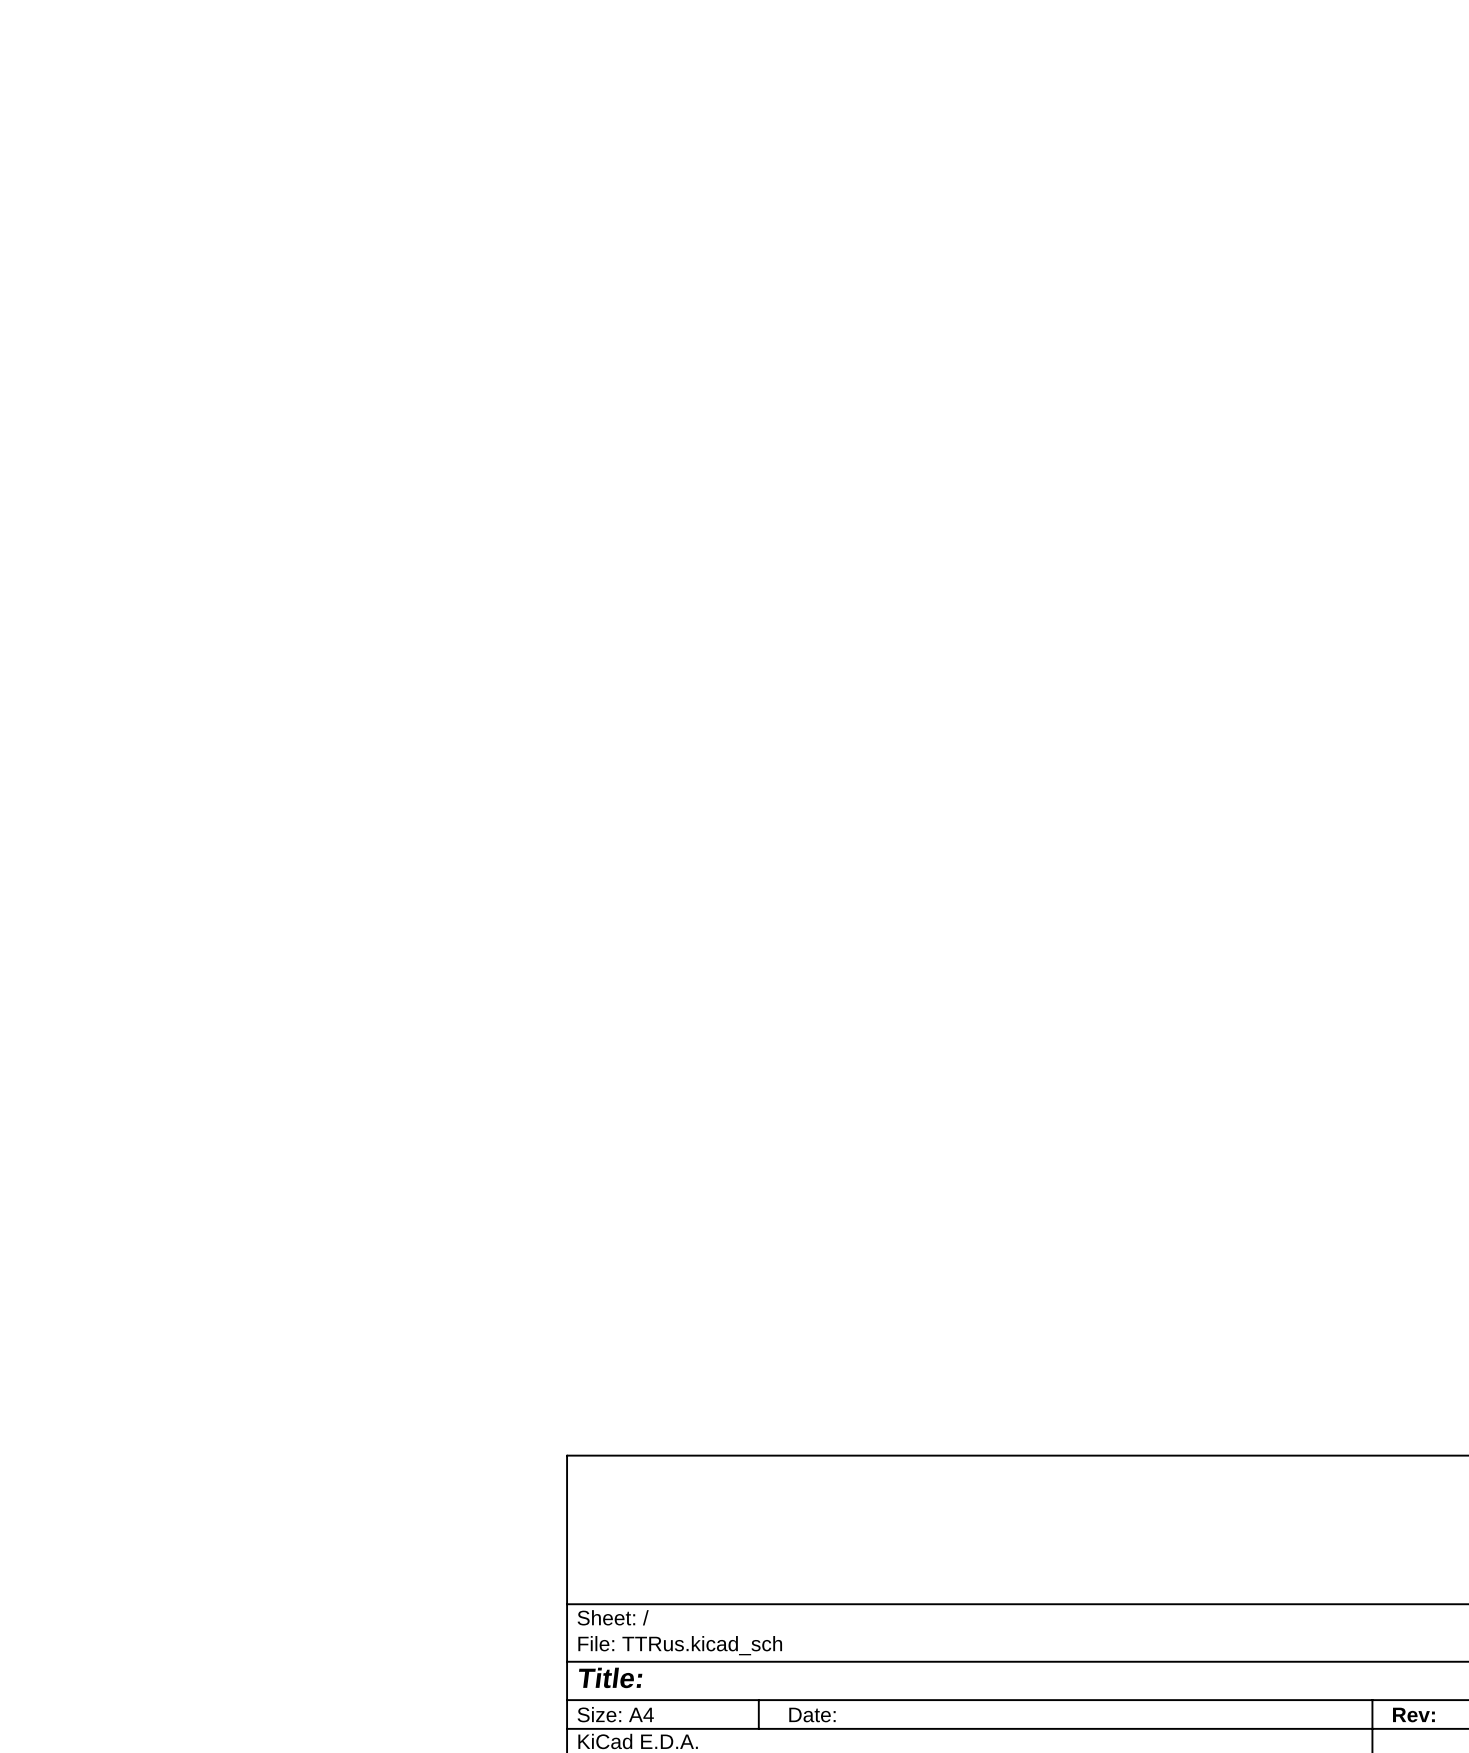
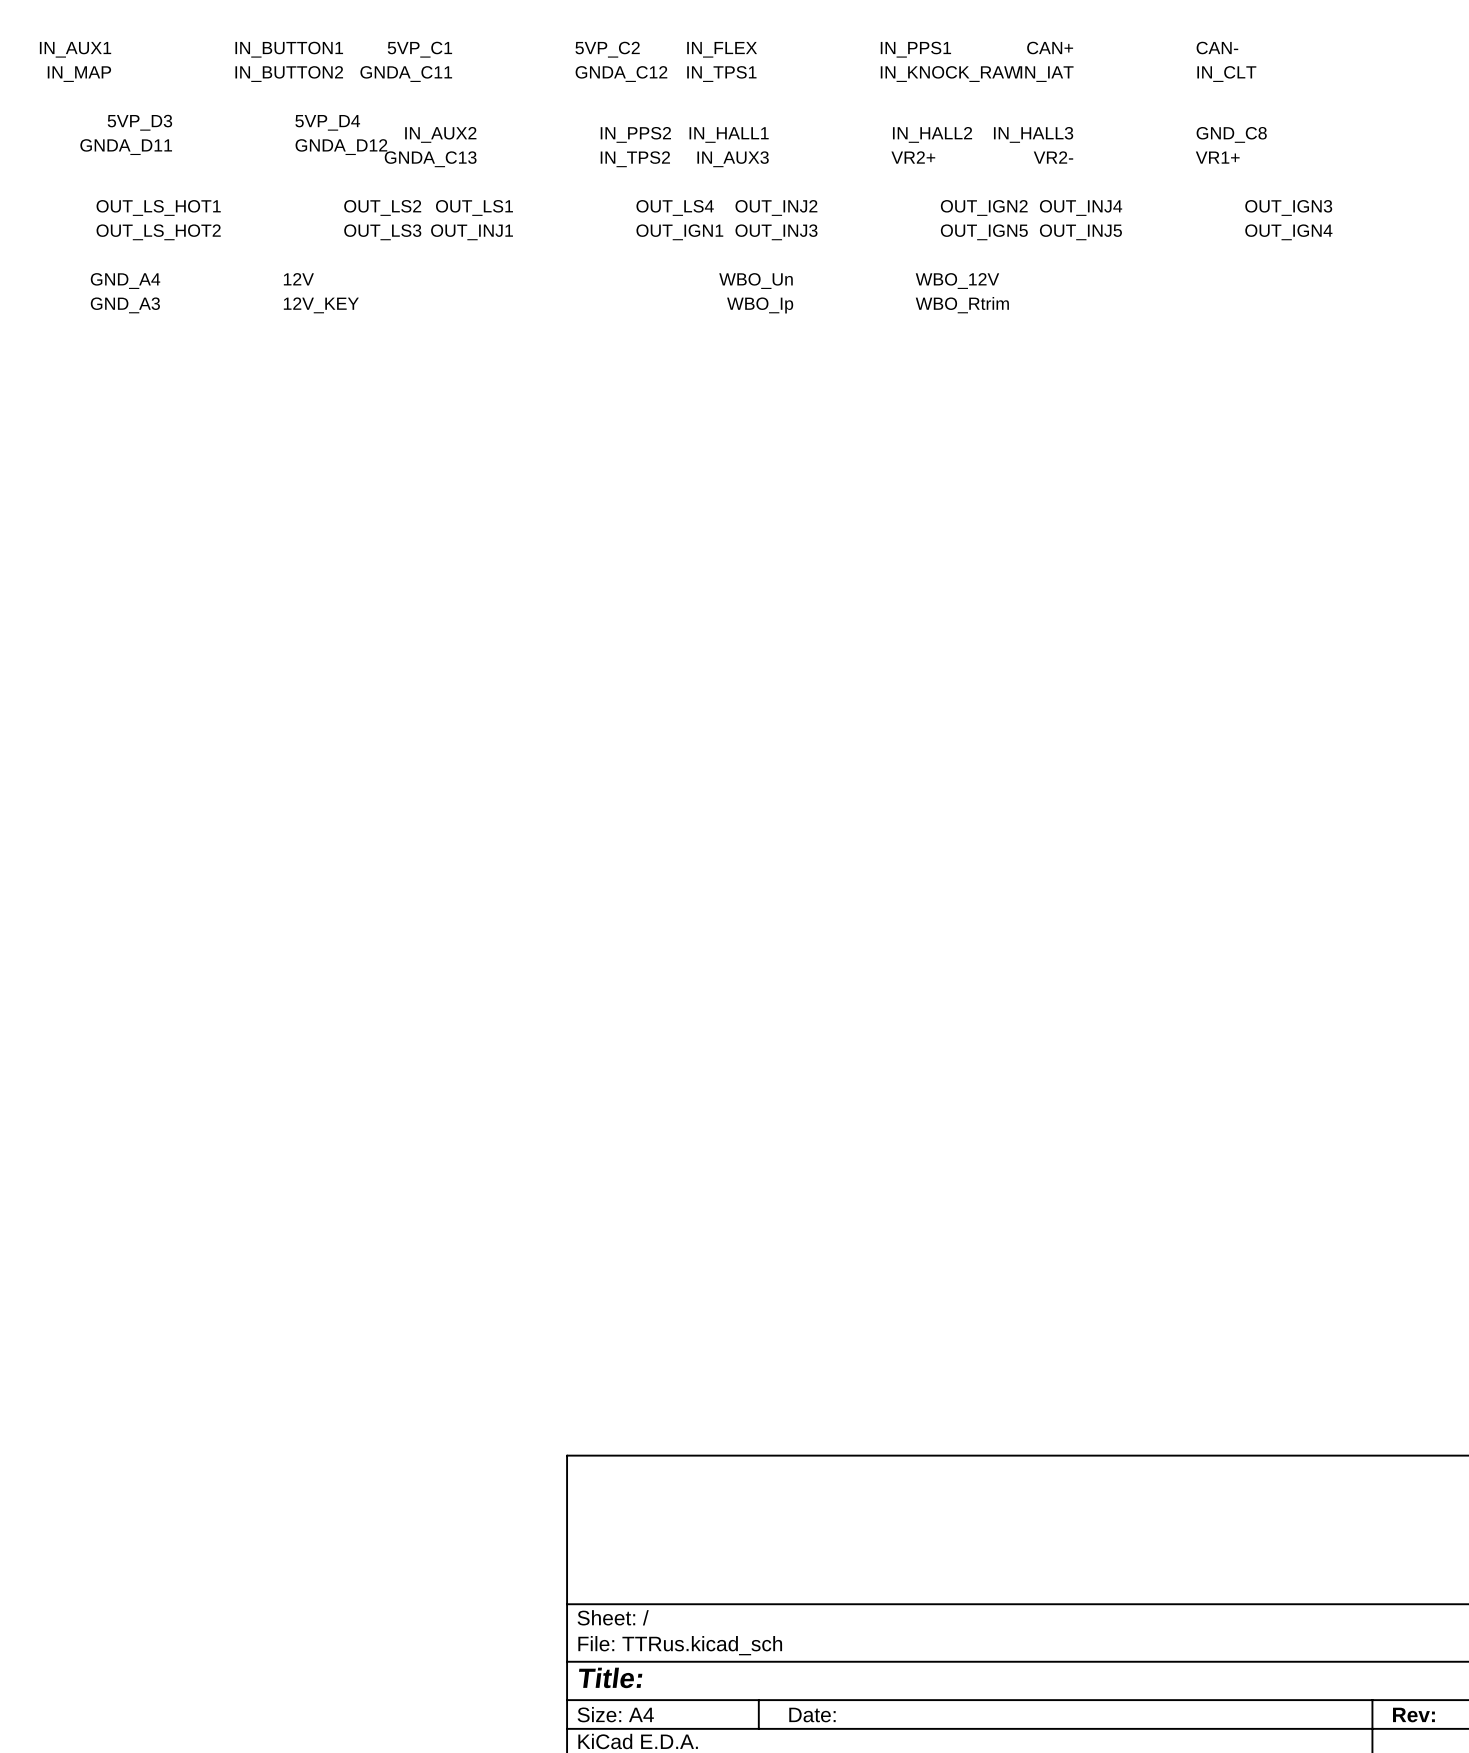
label: none -> CAN+ (1050, 48)
label: none -> CAN- (1217, 48)
label: none -> IN_AUX1 (75, 49)
label: none -> IN_BUTTON1 (289, 49)
label: none -> 5VP_C1 (419, 49)
label: none -> 5VP_C2 (607, 49)
label: none -> IN_FLEX (722, 49)
label: none -> IN_PPS1 (915, 49)
label: none -> IN_MAP (79, 74)
label: none -> IN_BUTTON2 (289, 74)
label: none -> GNDA_C11 (406, 74)
label: none -> GNDA_C12 (621, 74)
label: none -> IN_TPS1 (721, 74)
label: none -> IN_KNOCK_RAW (950, 74)
label: none -> IN_IAT (1047, 74)
label: none -> IN_CLT (1226, 74)
label: none -> 5VP_D3 (139, 122)
label: none -> 5VP_D4 (327, 122)
label: none -> IN_AUX2 (440, 134)
label: none -> IN_PPS2 (635, 134)
label: none -> IN_HALL2 (932, 134)
label: none -> IN_HALL3 (1033, 134)
label: none -> GND_C8 (1231, 134)
label: none -> IN_HALL1 (729, 135)
label: none -> GNDA_D11 (126, 147)
label: none -> GNDA_D12 (341, 147)
label: none -> VR2+ (913, 157)
label: none -> VR2- (1053, 157)
label: none -> VR1+ (1217, 157)
label: none -> GNDA_C13 (430, 159)
label: none -> IN_TPS2 (635, 159)
label: none -> IN_AUX3 (733, 159)
label: none -> OUT_LS_HOT1 (158, 207)
label: none -> OUT_LS2 (382, 207)
label: none -> OUT_LS1 (474, 207)
label: none -> OUT_LS4 (675, 207)
label: none -> OUT_INJ2 (776, 207)
label: none -> OUT_IGN2 (984, 207)
label: none -> OUT_INJ4 (1081, 207)
label: none -> OUT_IGN3 (1288, 207)
label: none -> OUT_LS_HOT2 (158, 232)
label: none -> OUT_LS3 (382, 232)
label: none -> OUT_INJ1 (472, 232)
label: none -> OUT_IGN1 (679, 232)
label: none -> OUT_INJ3 (776, 232)
label: none -> OUT_IGN5 (984, 232)
label: none -> OUT_INJ5 (1080, 232)
label: none -> OUT_IGN4 (1288, 232)
label: none -> 12V (298, 279)
label: none -> GND_A4 (125, 281)
label: none -> WBO_Un (756, 281)
label: none -> WBO_12V (957, 281)
label: none -> GND_A3 (125, 305)
label: none -> 12V_KEY (321, 305)
label: none -> WBO_Ip (760, 305)
label: none -> WBO_Rtrim (962, 305)

